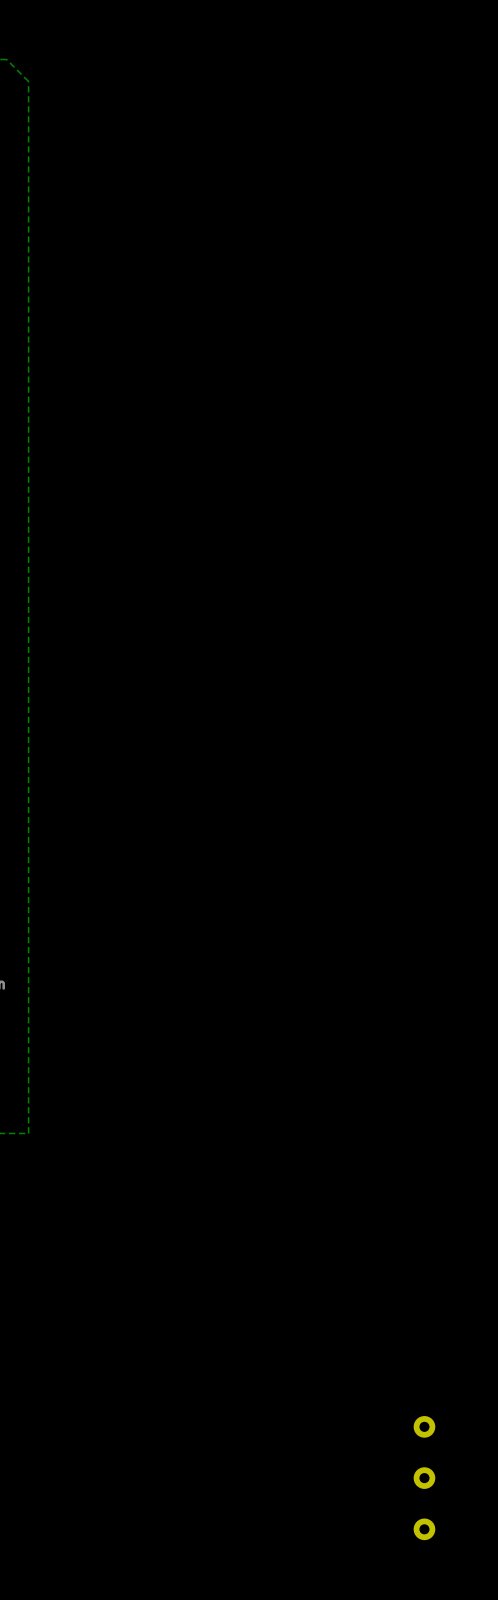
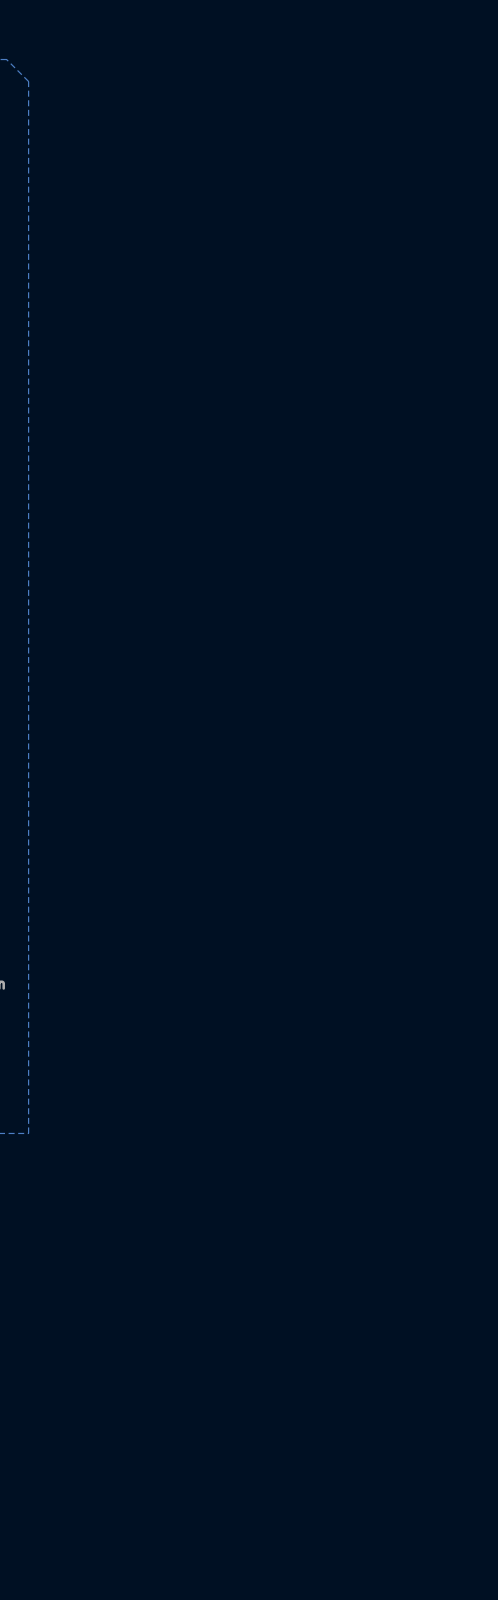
part: (424, 1426) -> none
part: (424, 1478) -> none
part: (424, 1529) -> none

